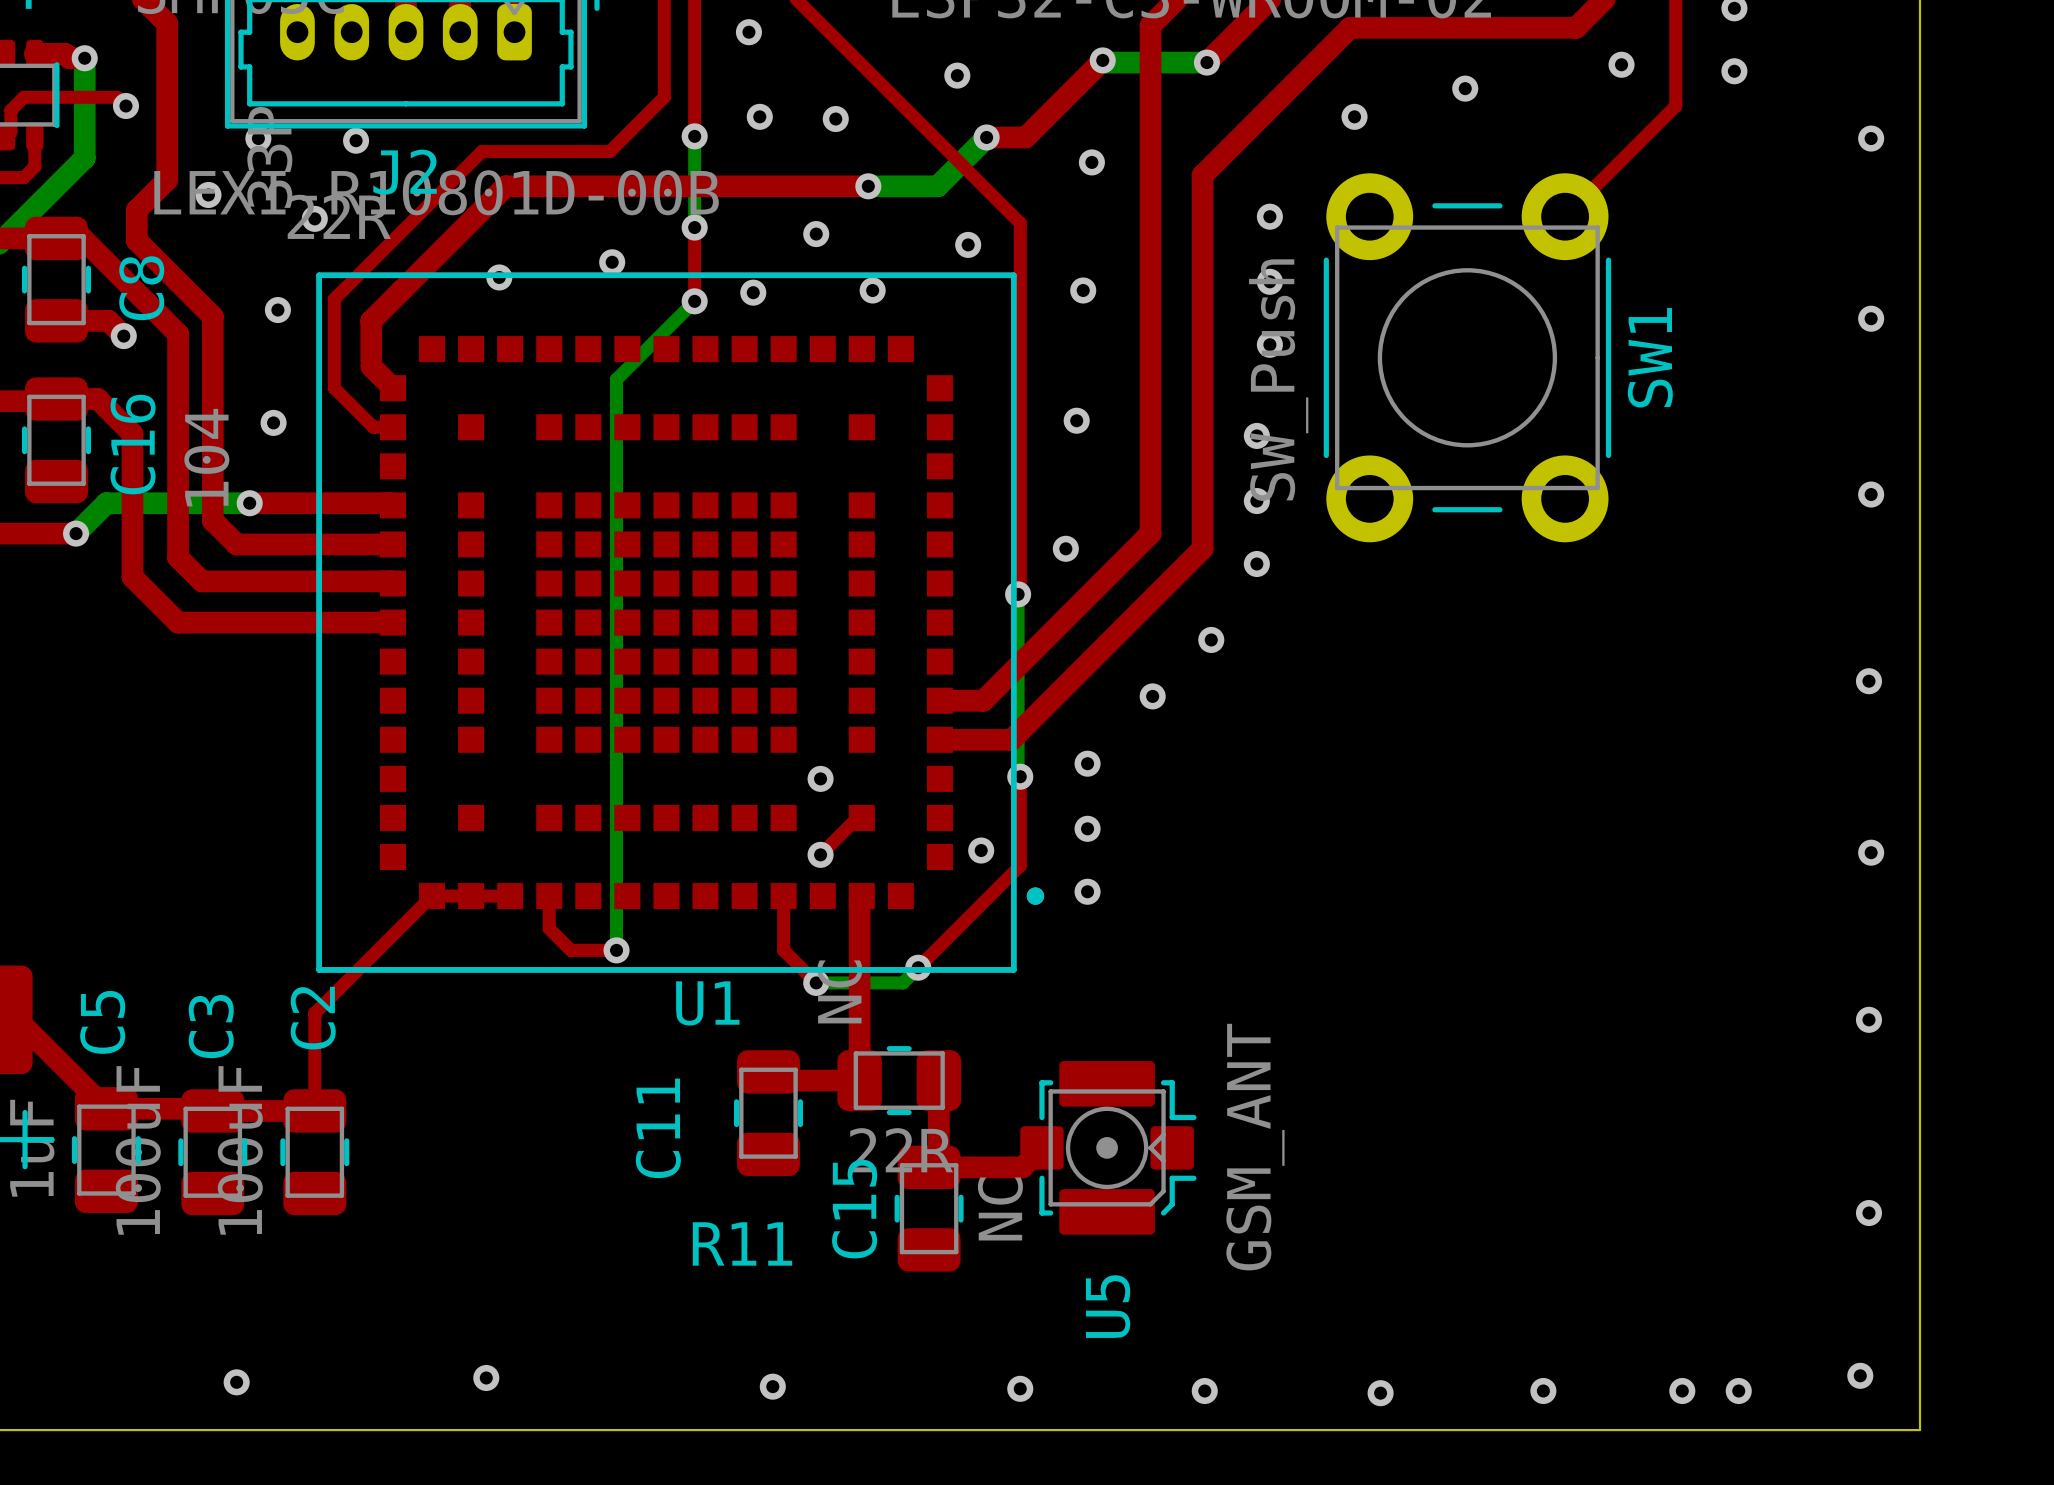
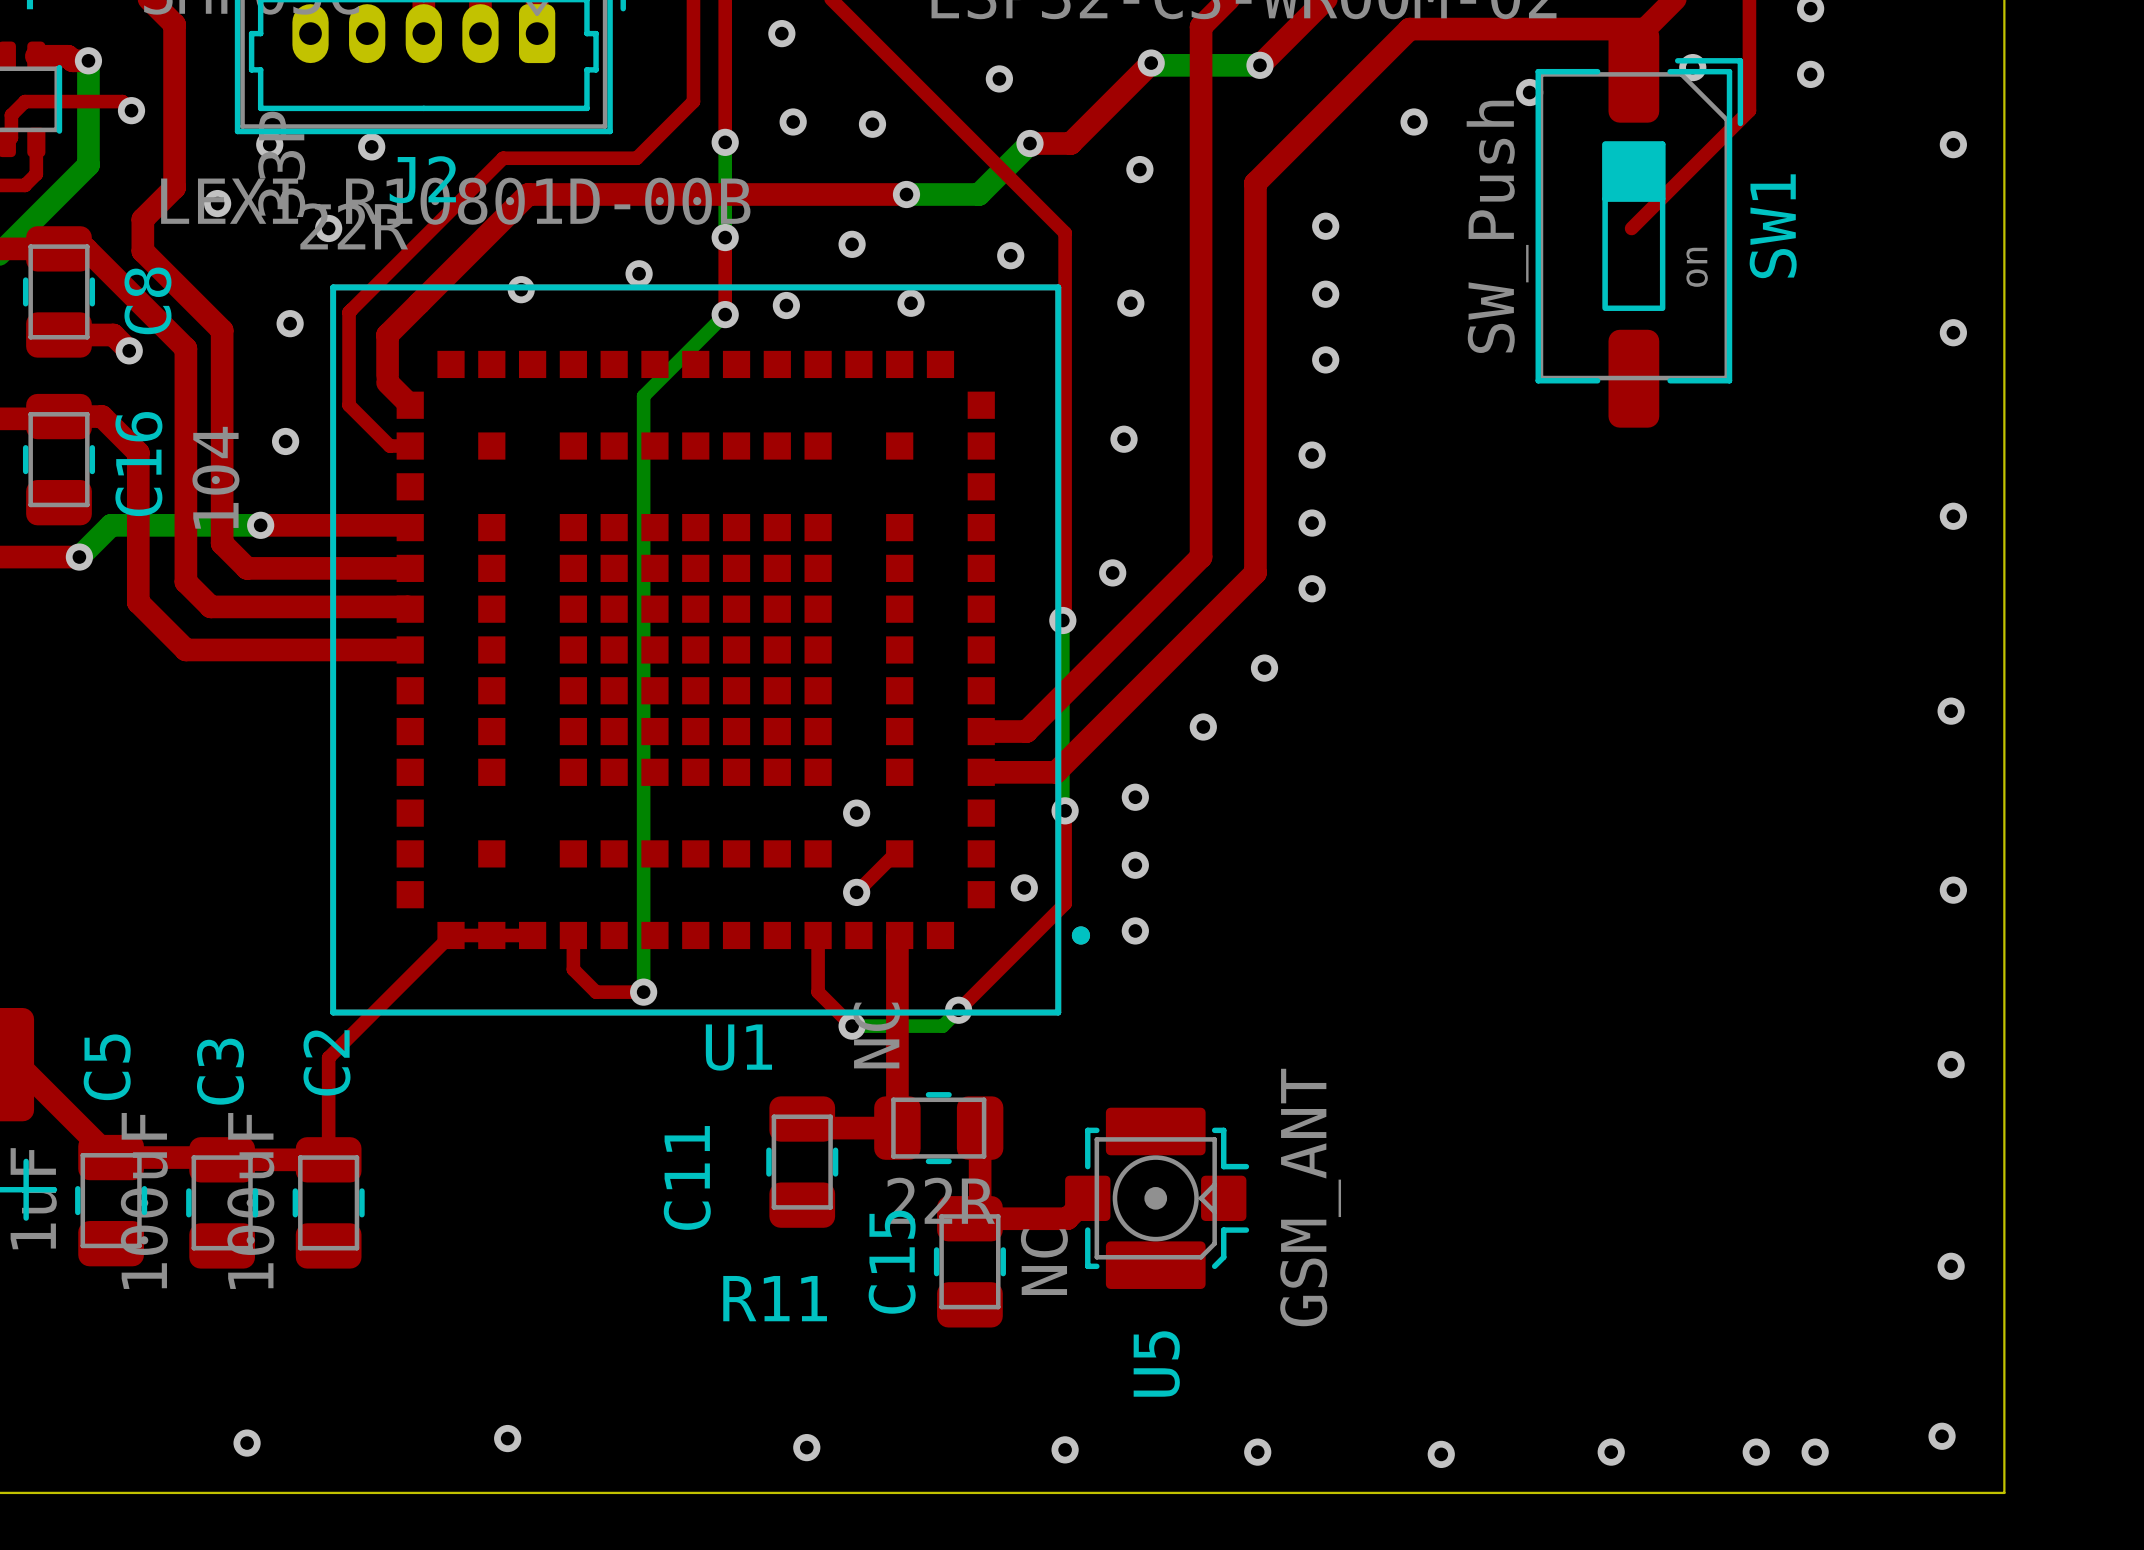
SW1 footprint: [1323, 173, 1612, 543] -> [1535, 24, 1744, 428]

